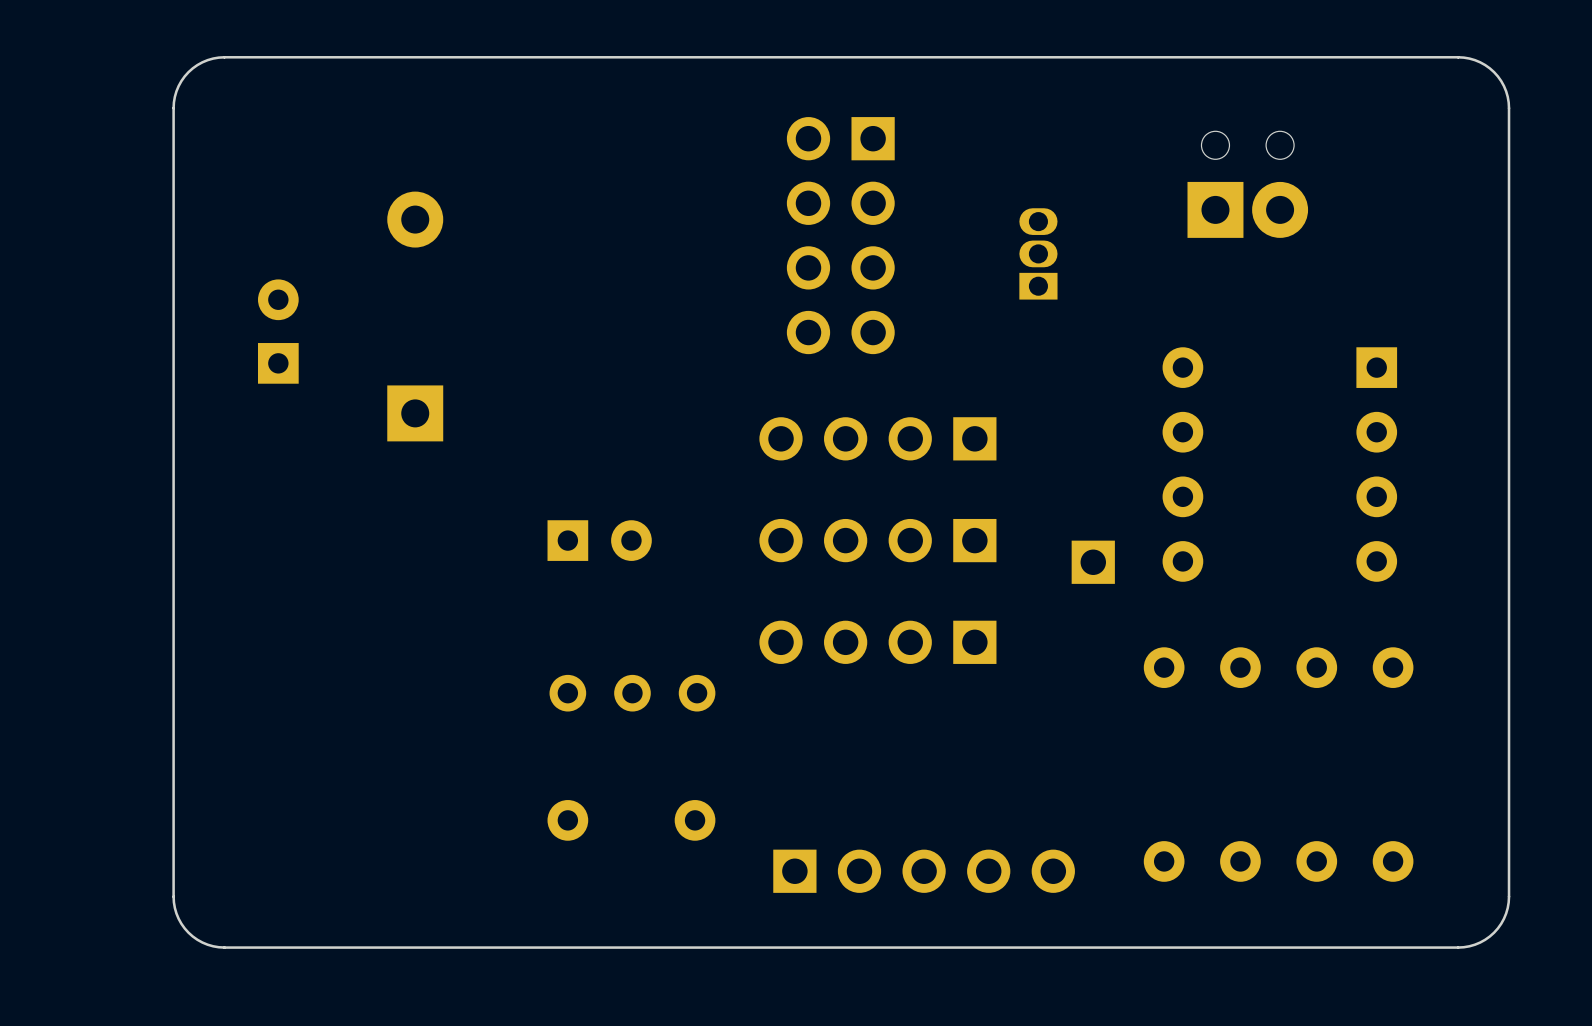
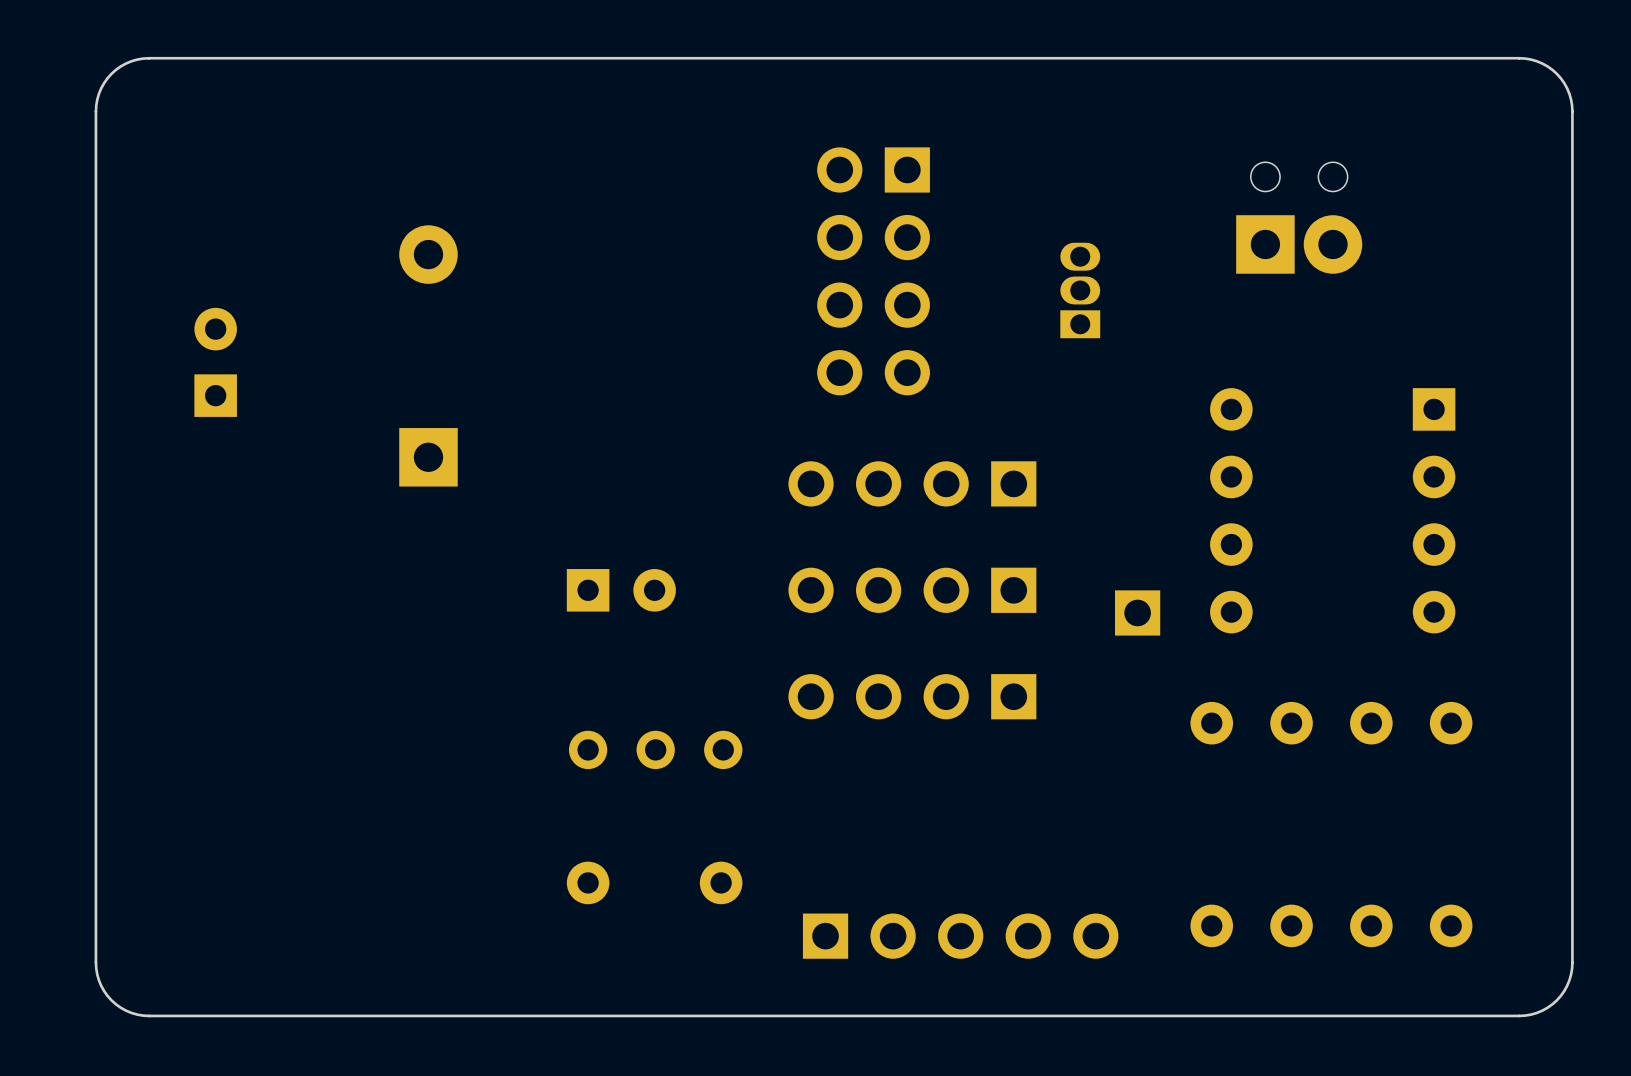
board edge: (1509, 108) (1506, 91) (1494, 72) (1474, 60) (1458, 57) (224, 57) (213, 58) (197, 65) (188, 72) (178, 86) (173, 108) (173, 896) (176, 913) (188, 932) (202, 942) (224, 947) -> (1572, 138) (1572, 105) (1564, 83) (1547, 66) (1536, 61) (1519, 58) (149, 58) (131, 61) (120, 66) (104, 83) (98, 93) (95, 111) (96, 968) (101, 985) (107, 995) (120, 1007) (131, 1012) (149, 1015) (228, 1015)
part position: (278, 331) -> (215, 362)

